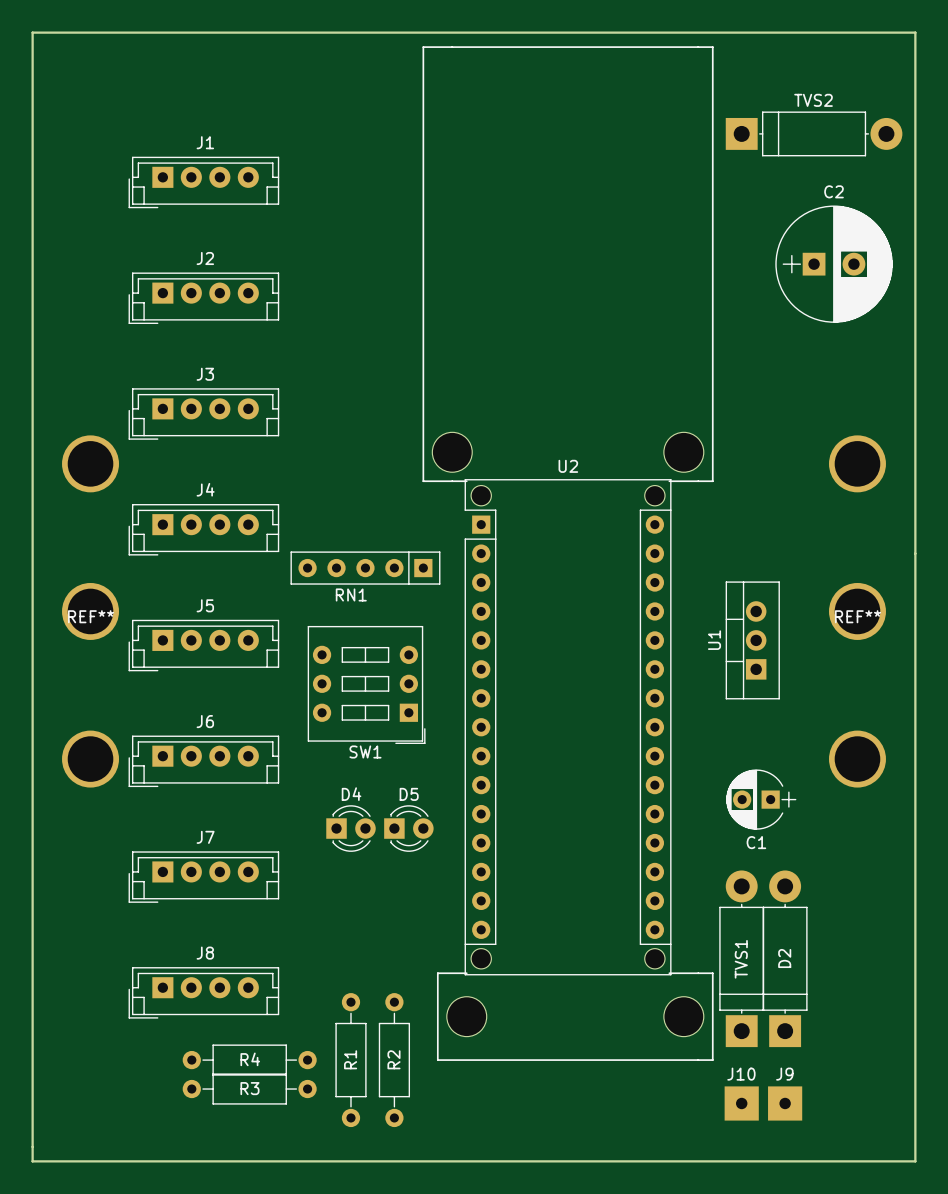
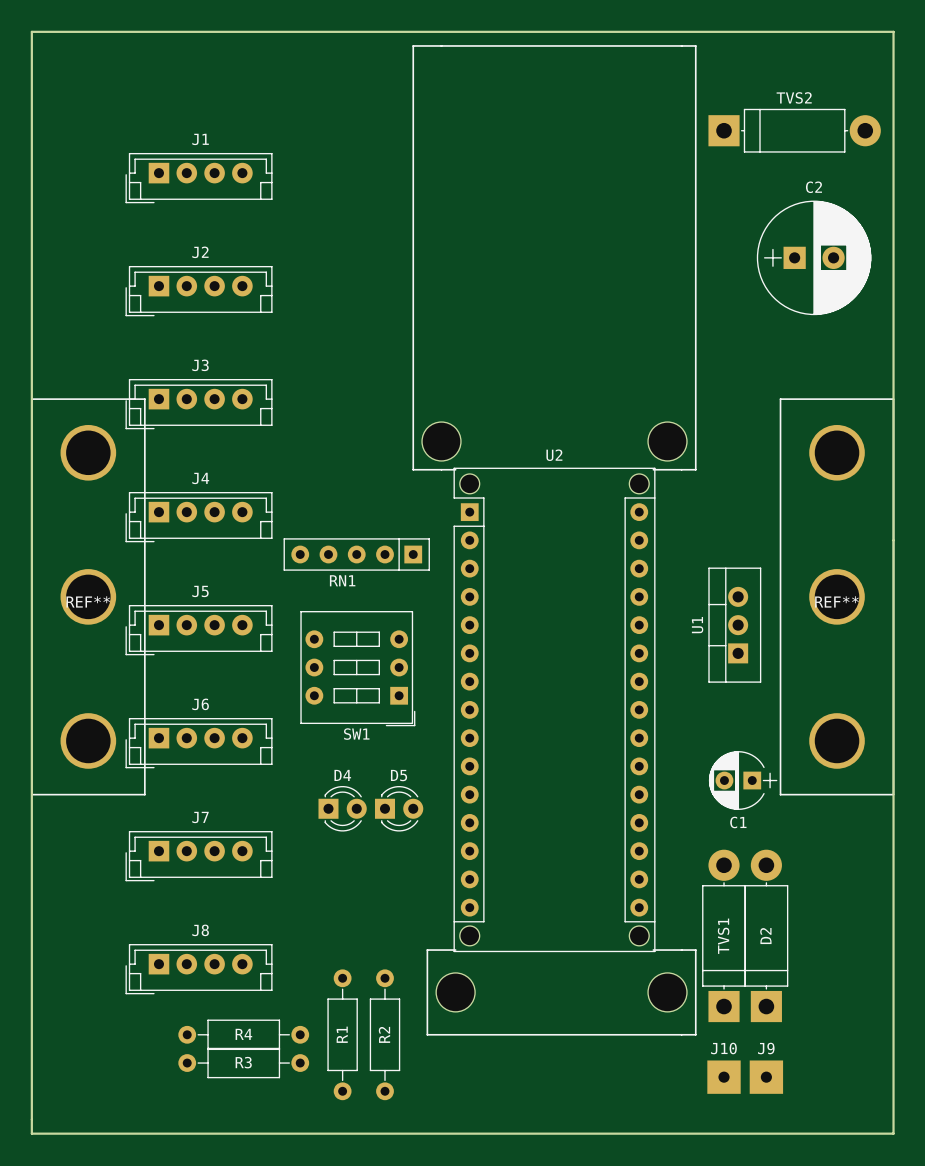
REF** footprint: [62, 435, 120, 788] -> [31, 398, 146, 796]
REF** footprint: [828, 435, 886, 788] -> [779, 398, 895, 796]

